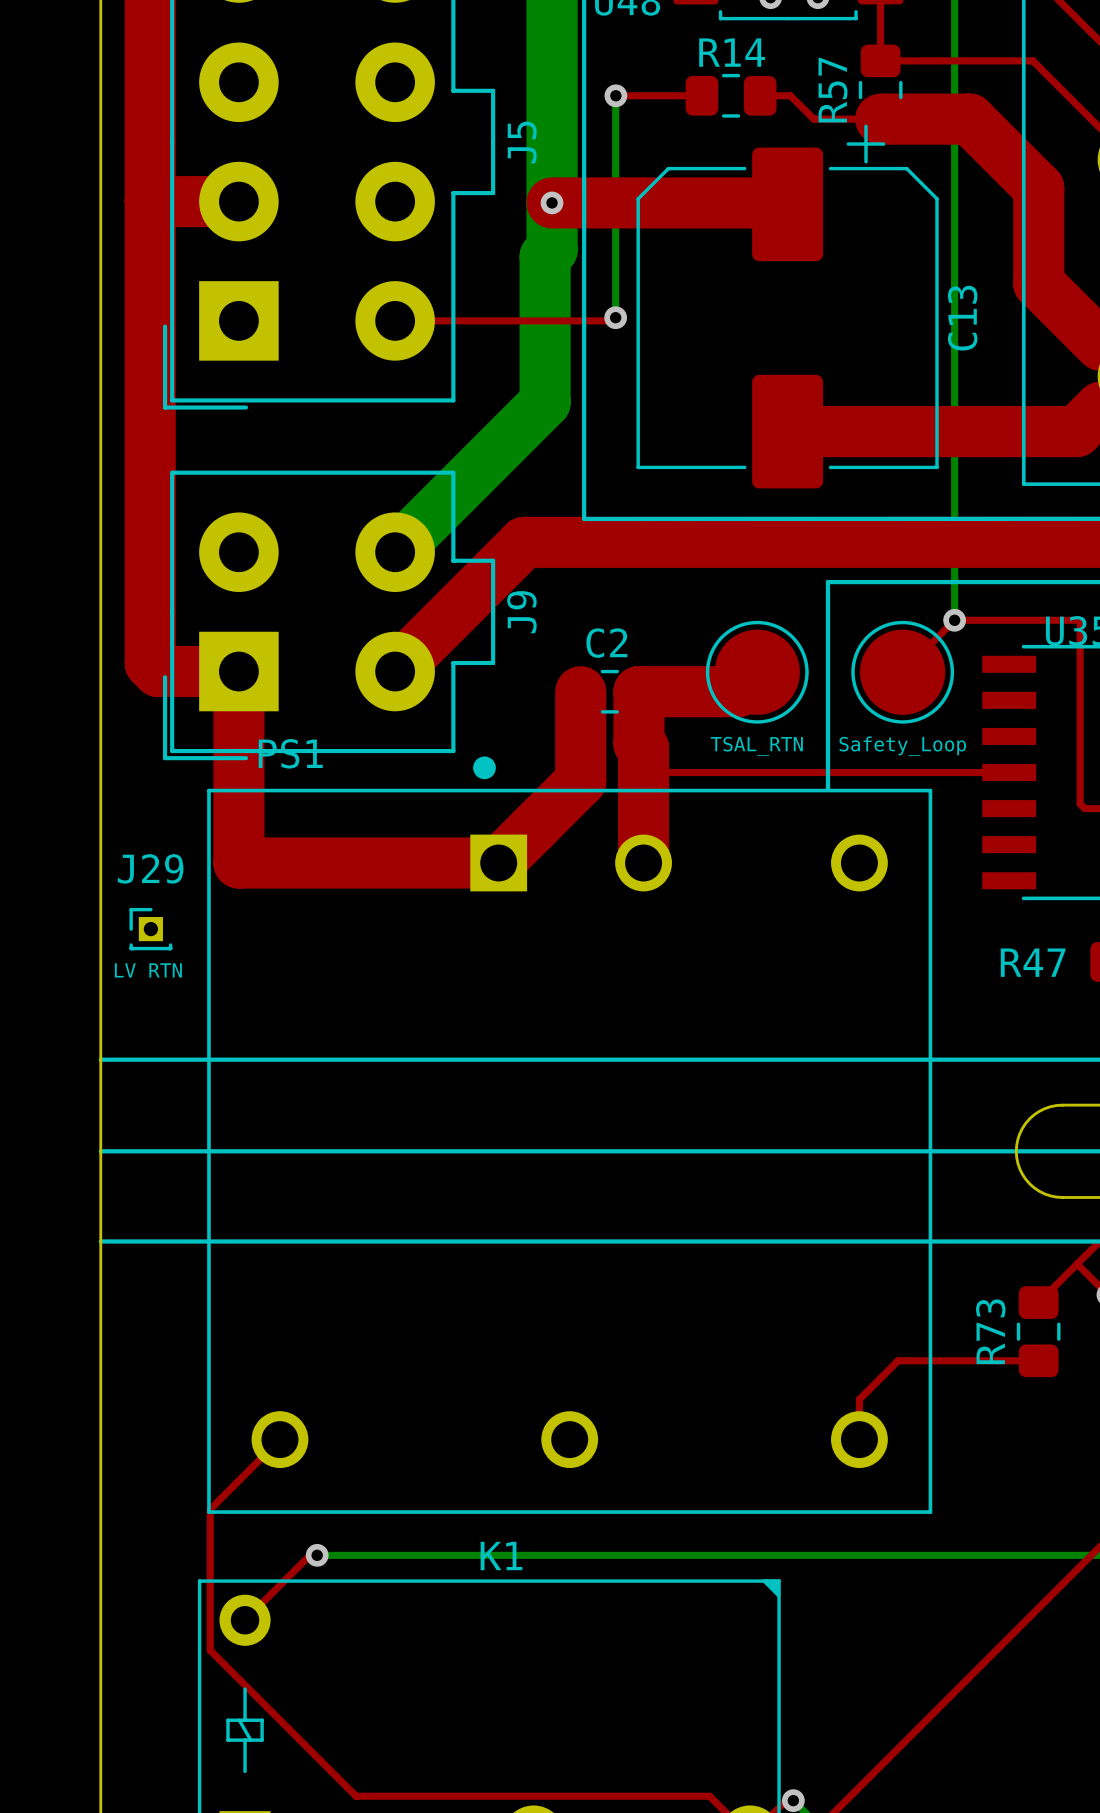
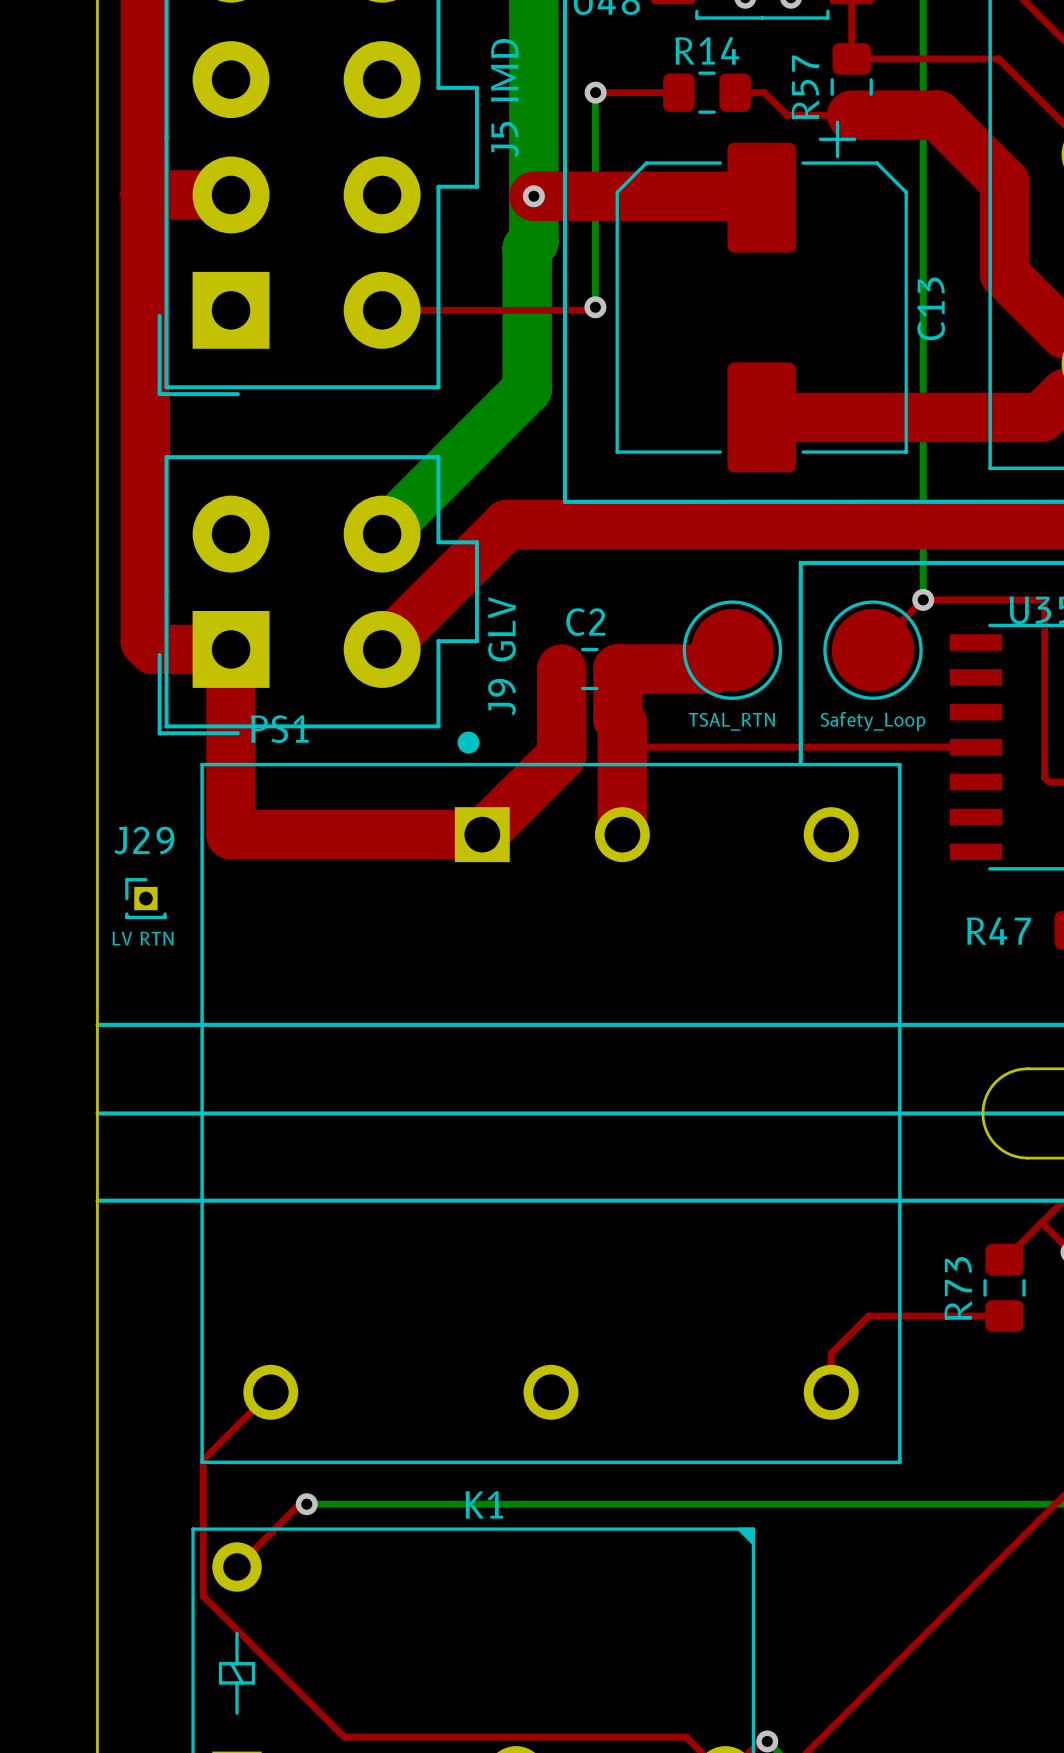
J5 name: J5 (522, 142) -> J5 IMD (504, 98)
J9 name: J9 (521, 612) -> J9 GLV (501, 656)

